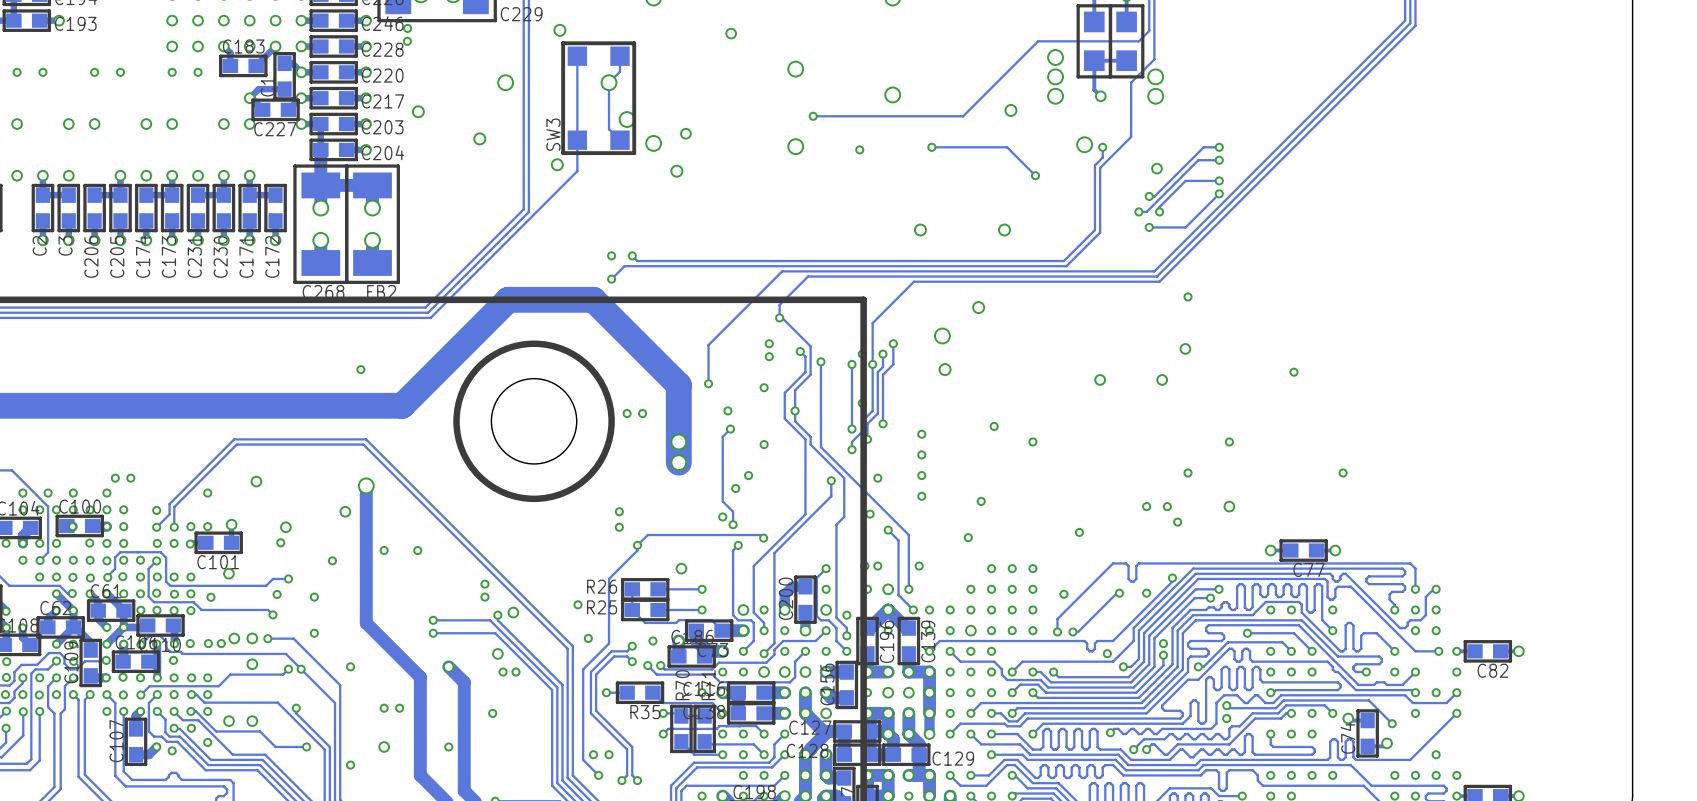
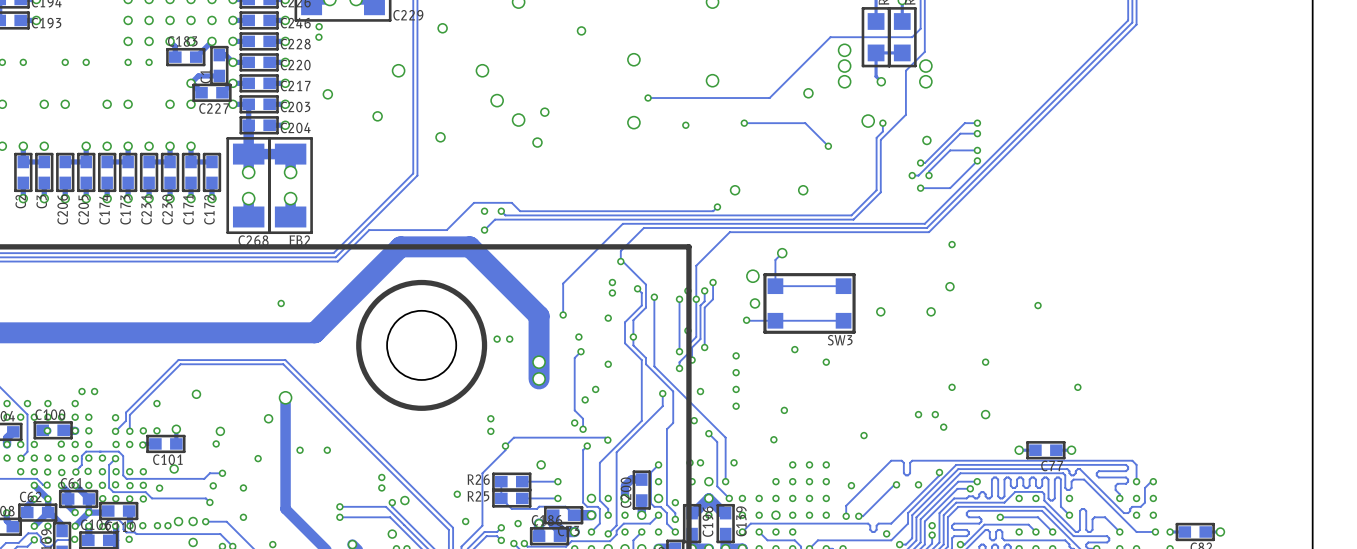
track: (577, 56) (577, 171) (469, 279) -> (717, 207) (713, 211) (520, 211) (511, 202) (474, 202) (446, 230) (369, 230)
track: (620, 56) (620, 71) (609, 82) (609, 129) (620, 140) -> none
SW3 rotation: 0° (598, 98) -> 90° clockwise (809, 303)
SW3 position: (598, 98) -> (809, 303)
SW3 name position: SW3 (553, 134) -> SW3 (840, 340)
via: none -> (717, 207)
track: none -> (782, 253) (775, 259) (775, 286) (843, 286)
track: none -> (746, 320) (843, 320)
via: none -> (746, 320)

